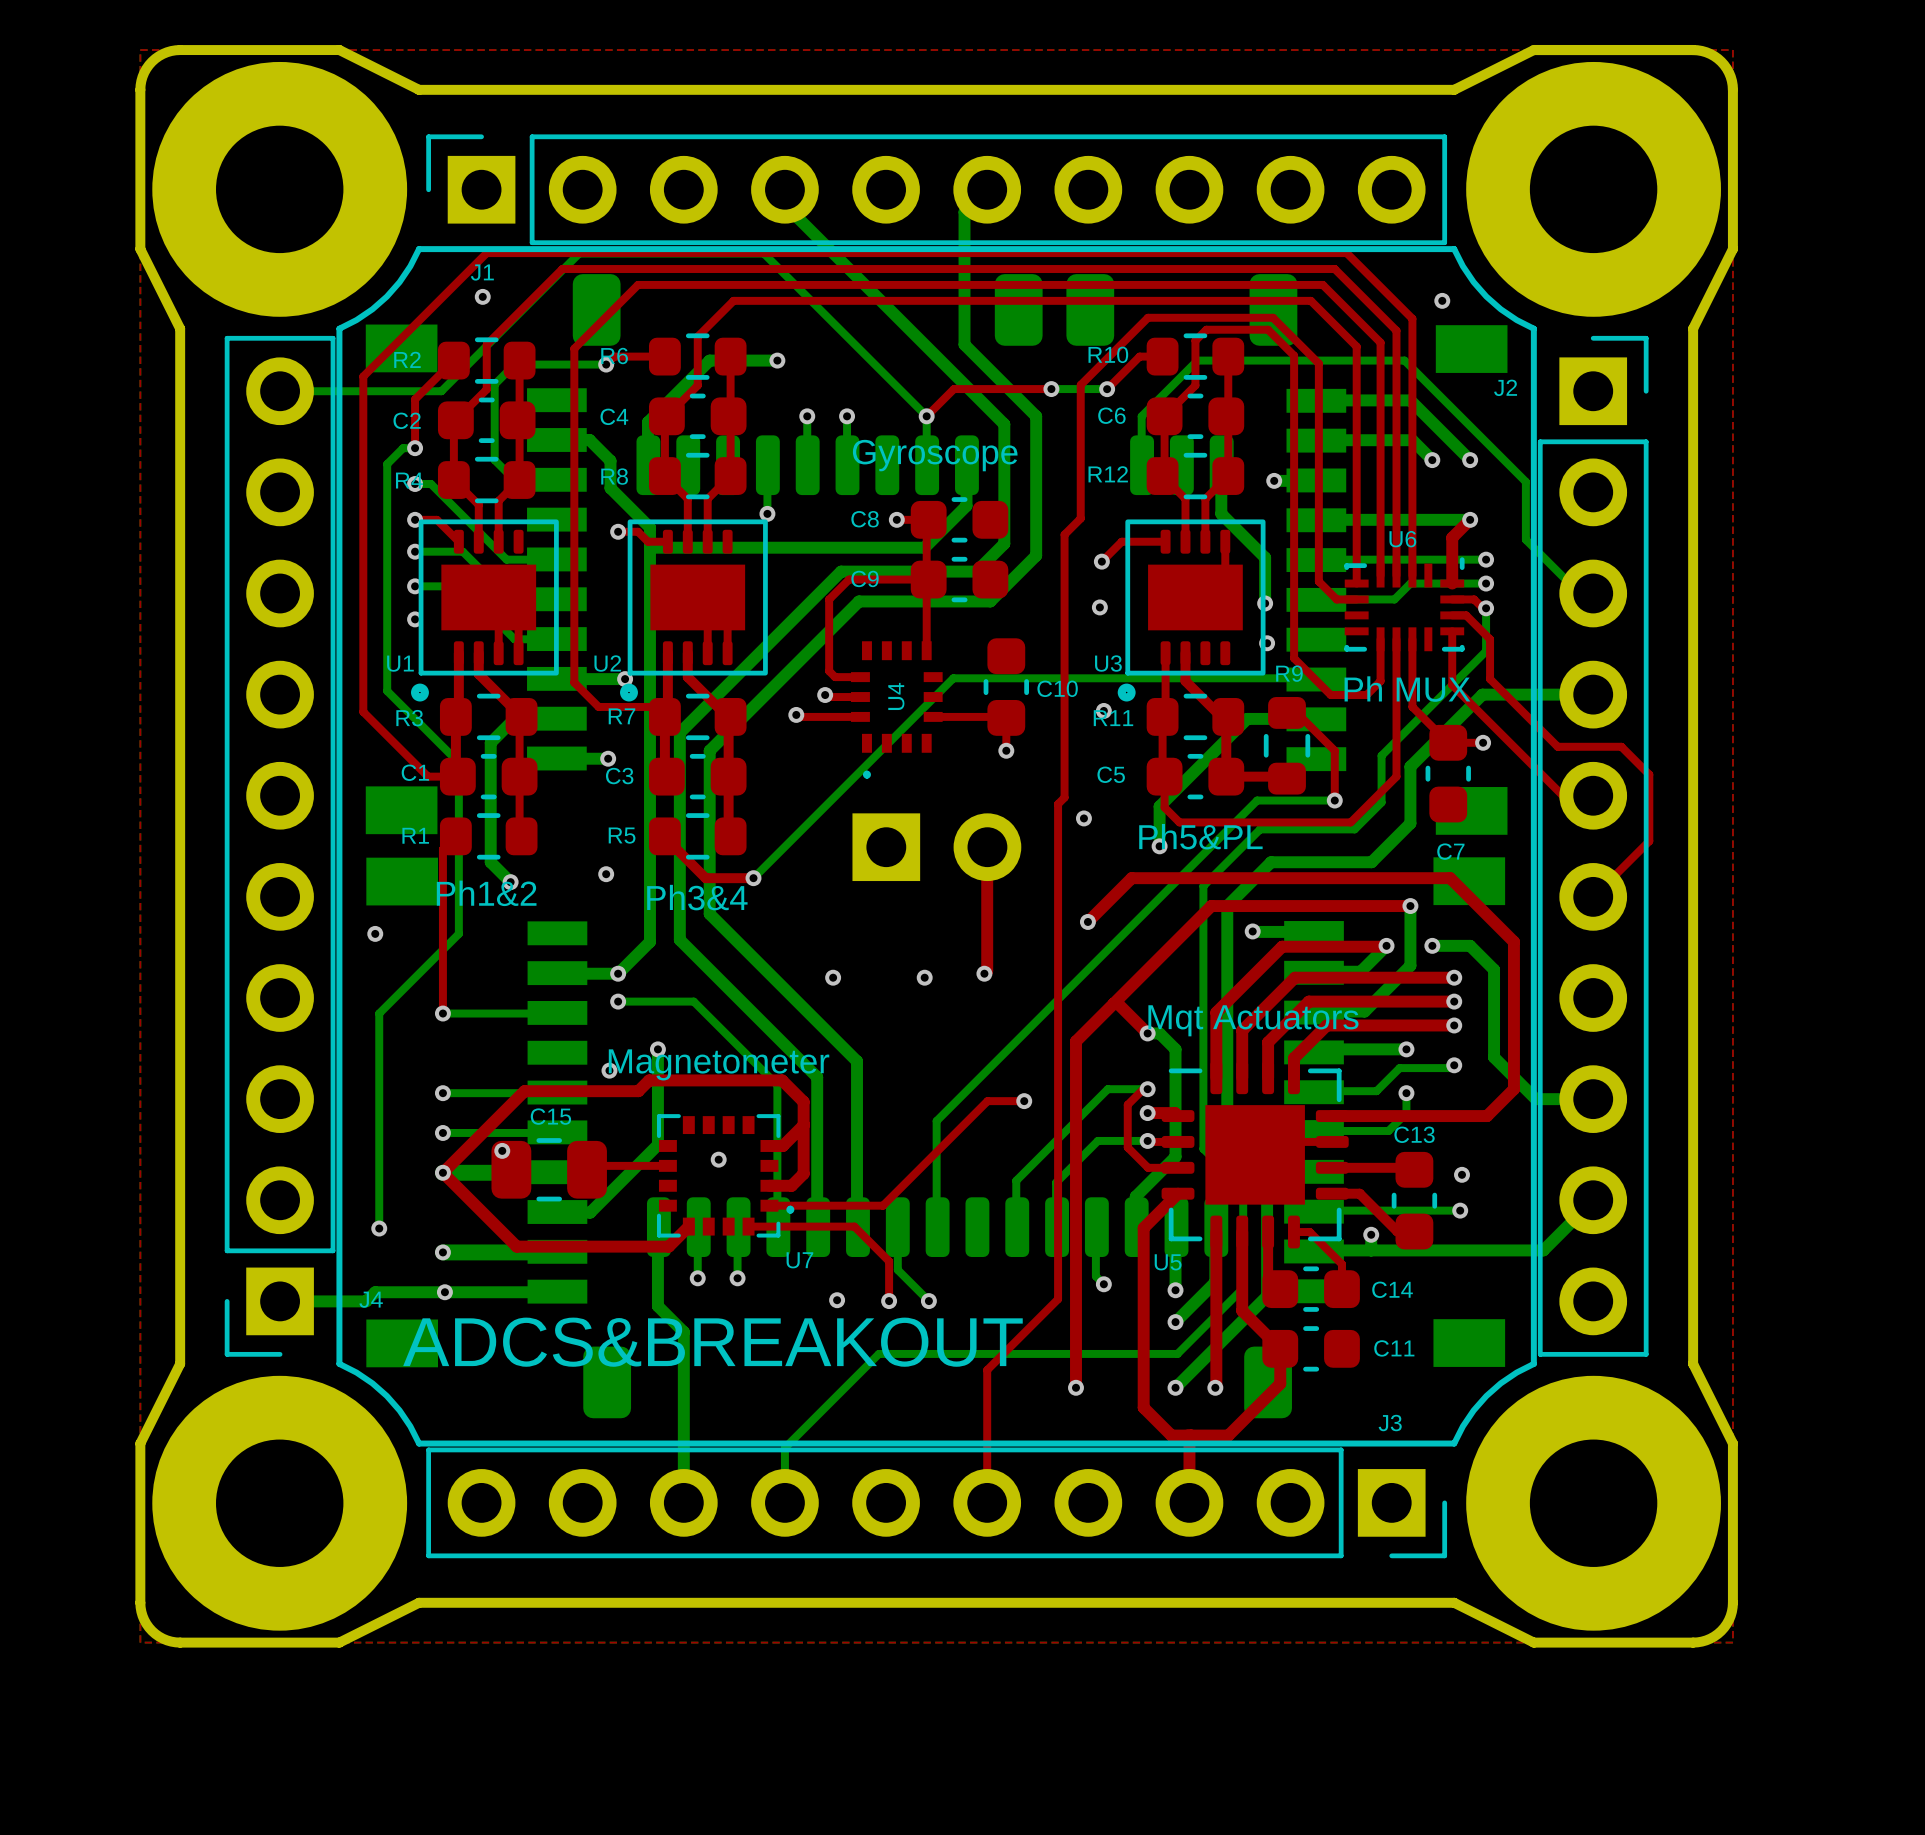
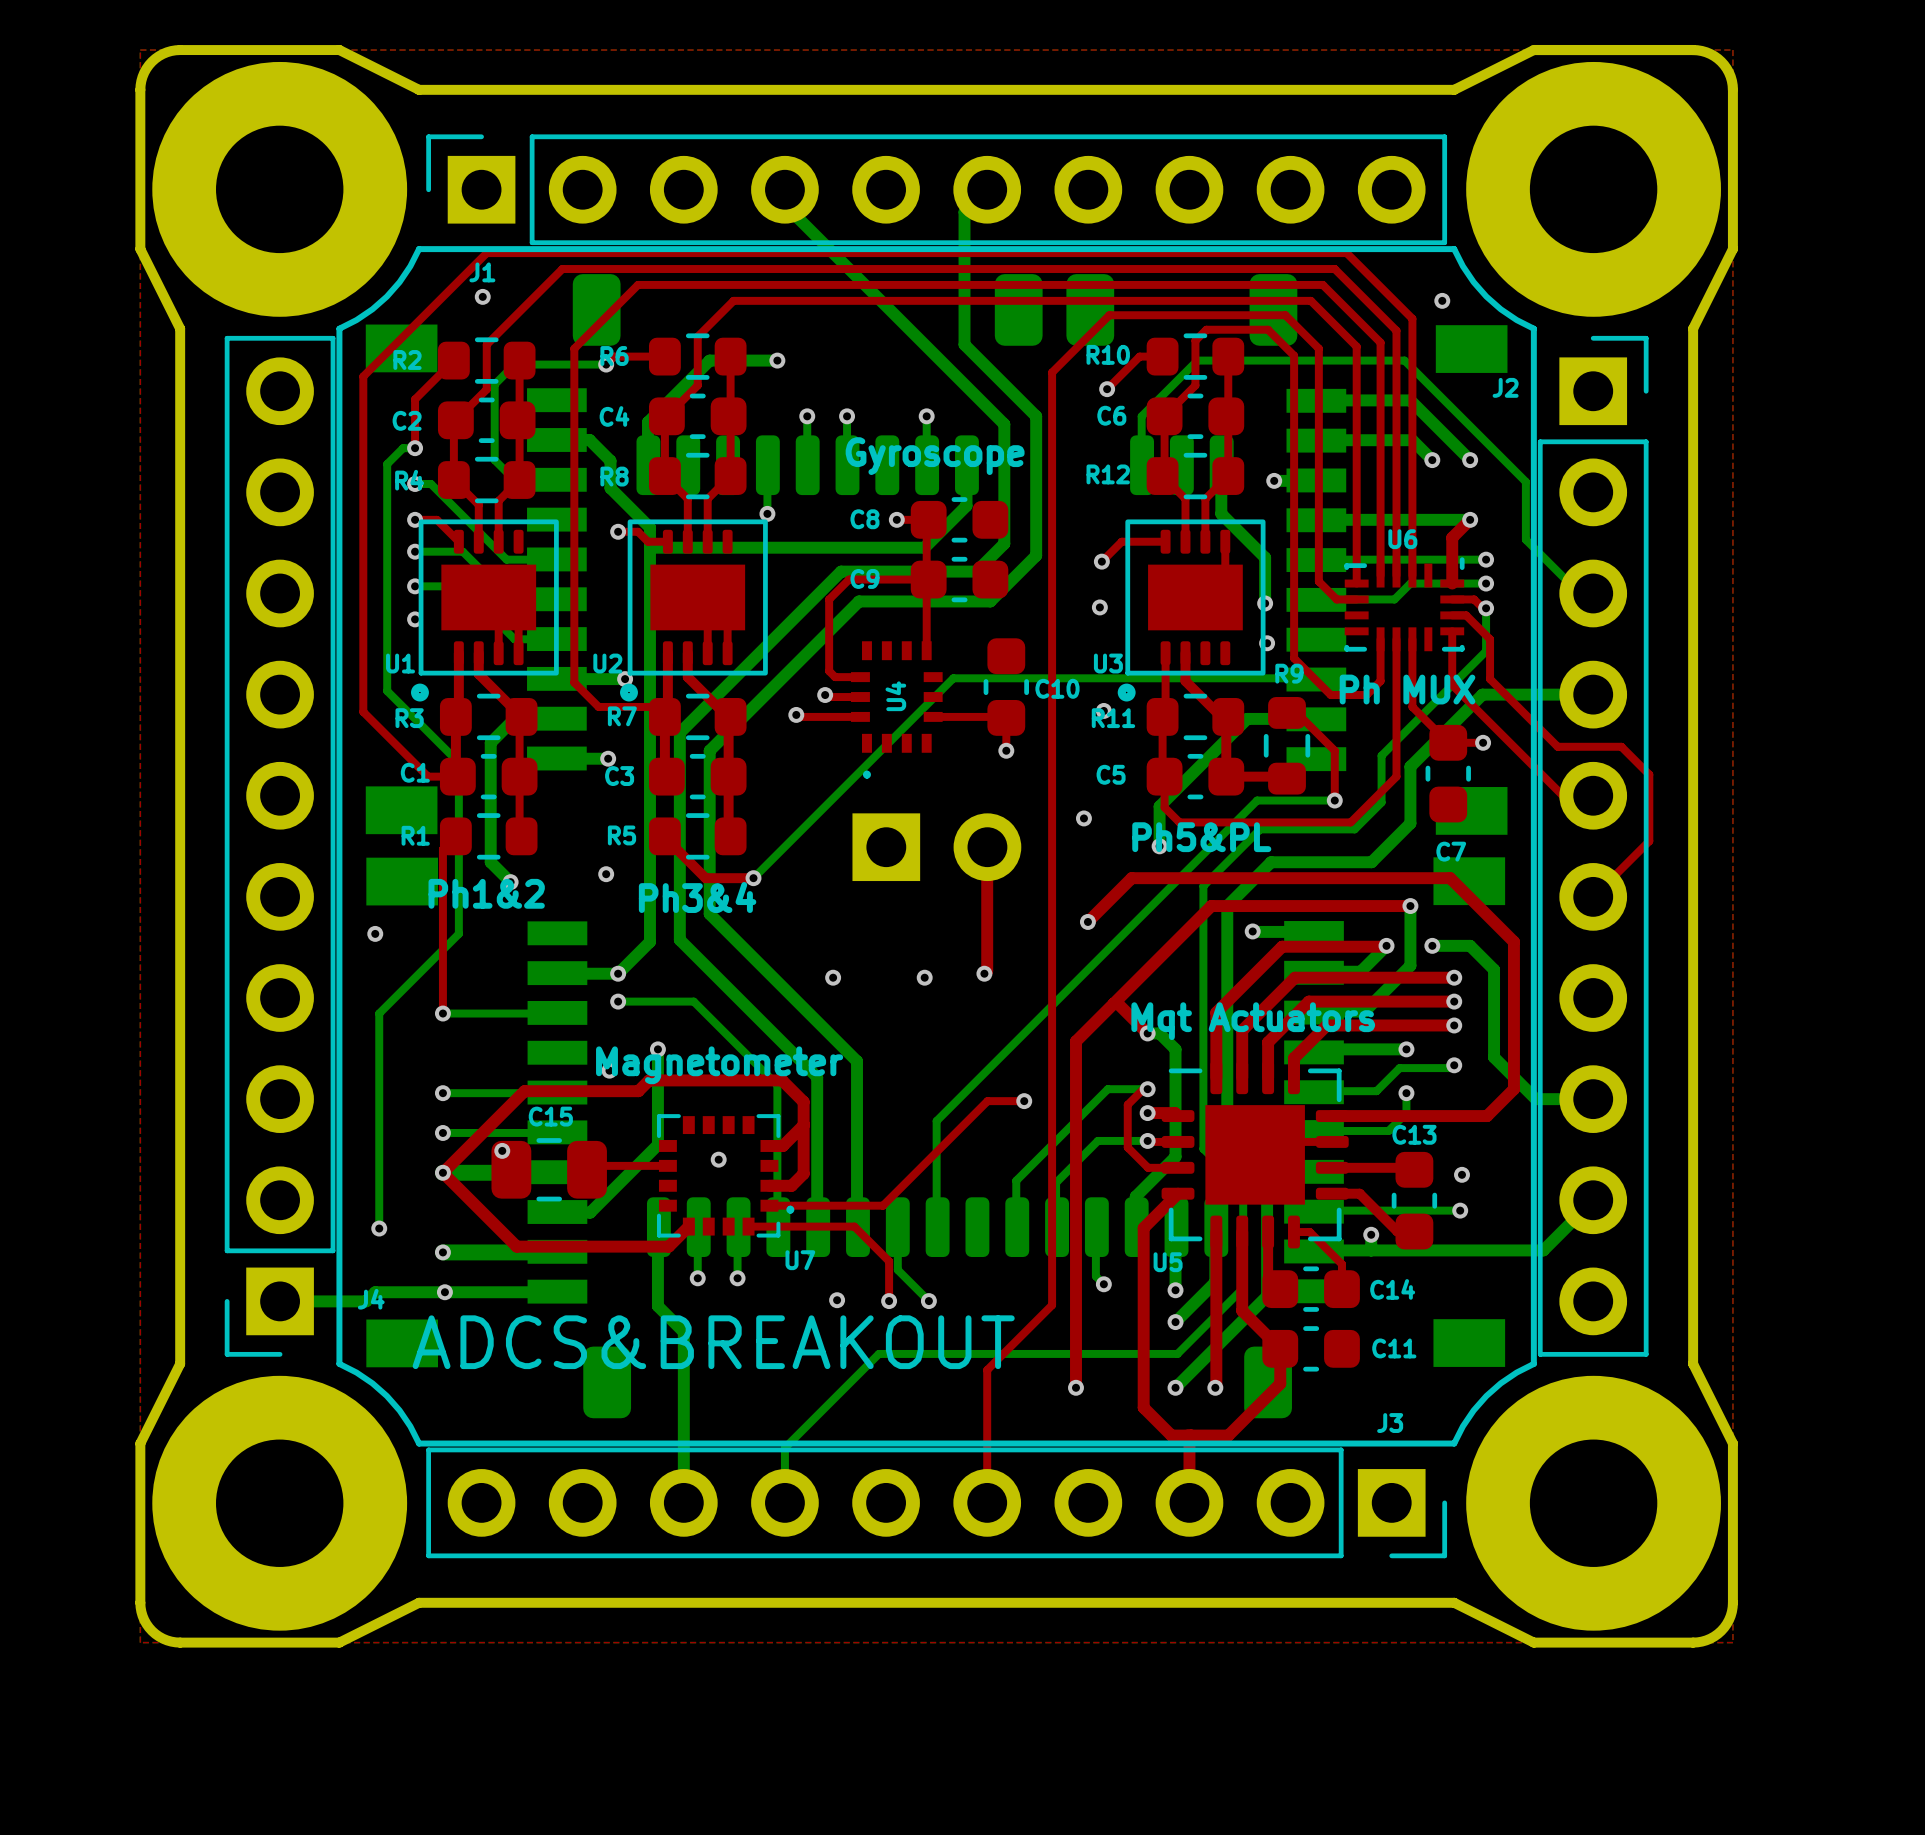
top track: (1318, 363) (1273, 317) (1147, 317) (1080, 385) (1080, 518) (1064, 534) (1064, 797) (1058, 804) (1058, 1299) (1052, 1305) -> (1318, 363) (1318, 348) (1285, 315) (1109, 315) (1052, 372) (1052, 1305)
bottom track: (1051, 388) (1107, 389) -> none
top track: (1051, 389) (953, 389) (926, 416) -> none
via: (1051, 389) -> none
bottom track: (280, 391) (441, 391) (579, 253) (763, 253) (926, 416) -> none

